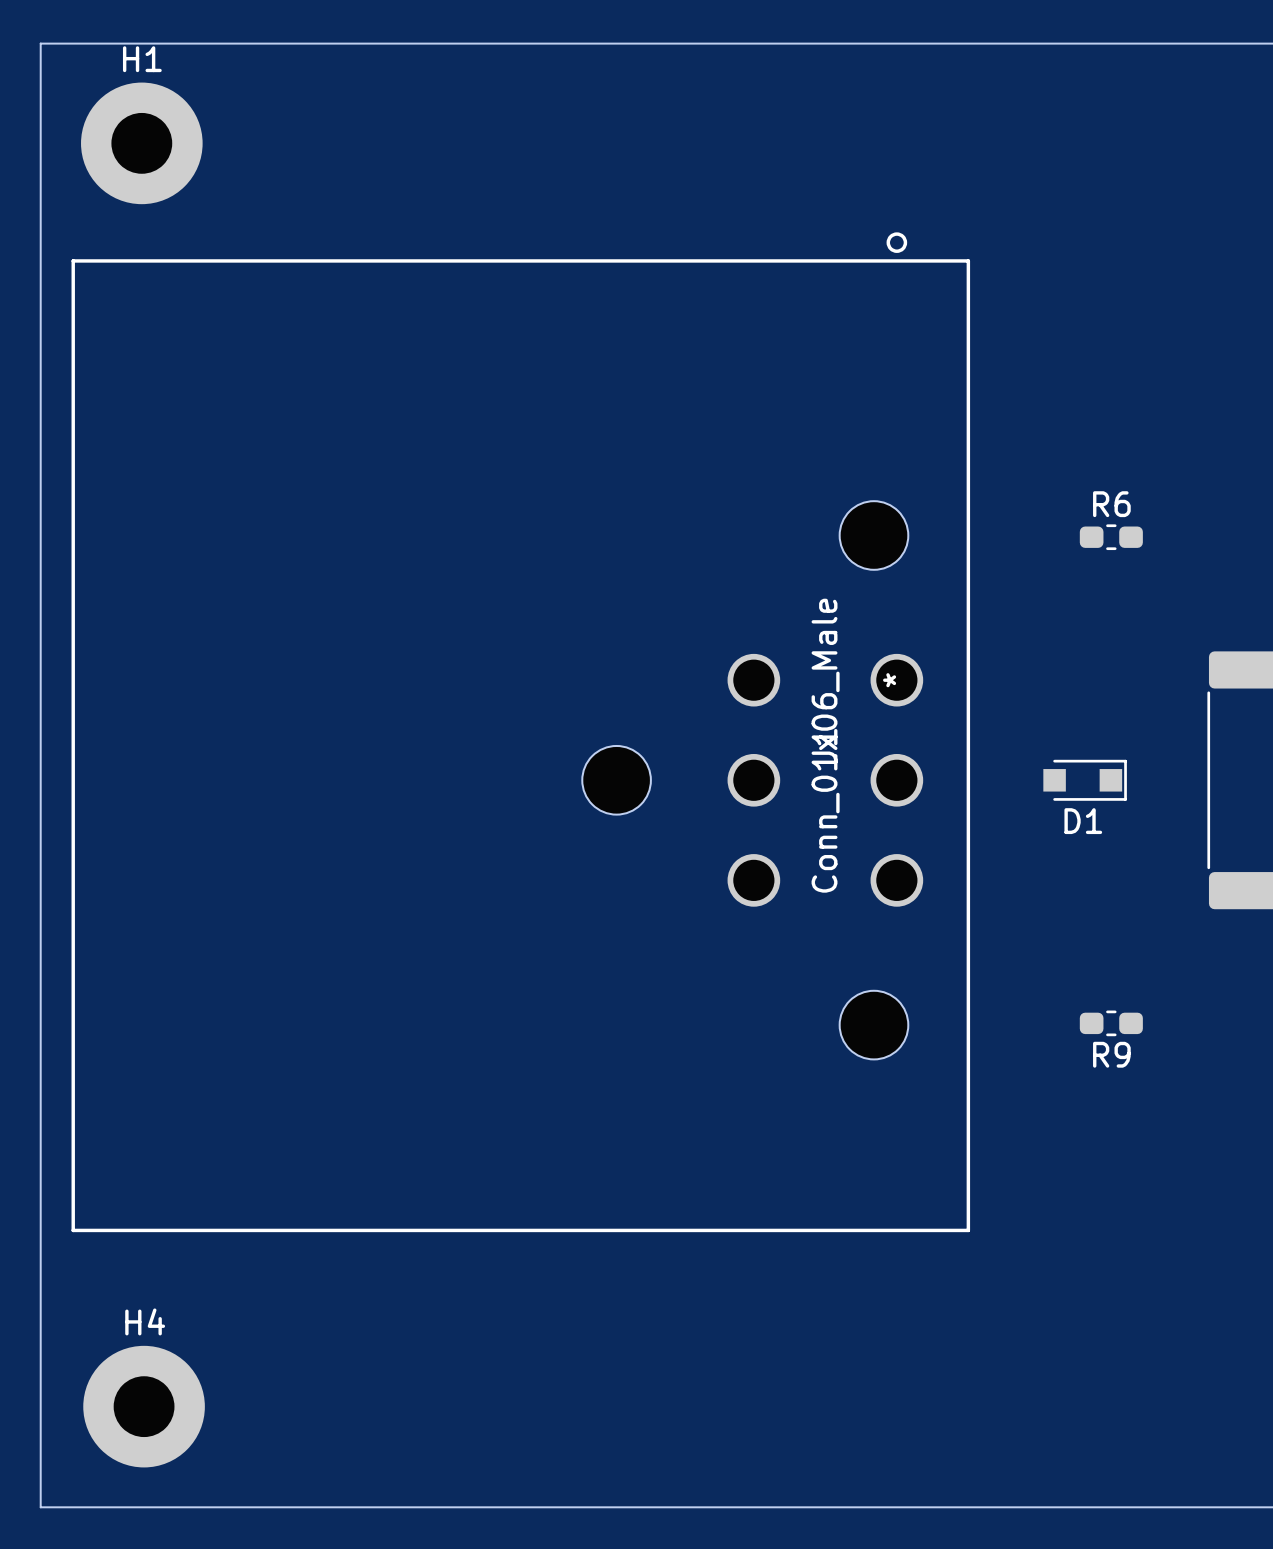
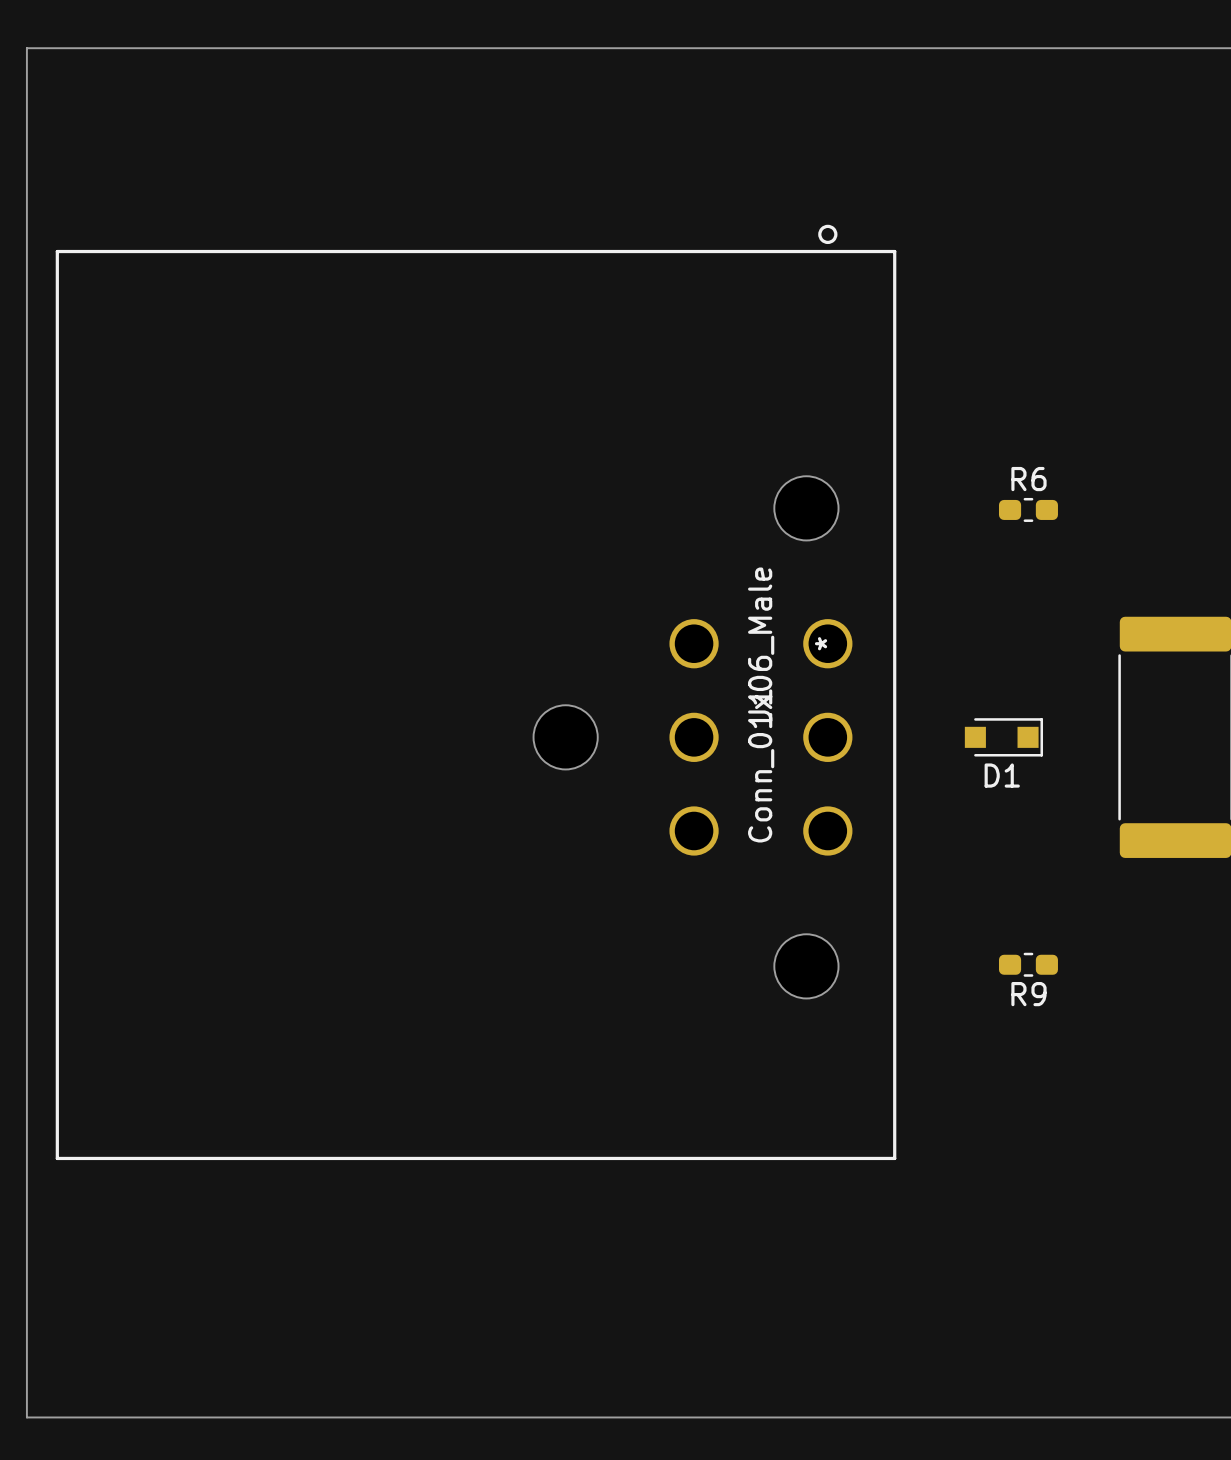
H1: (141, 143) -> none
H4: (144, 1406) -> none

